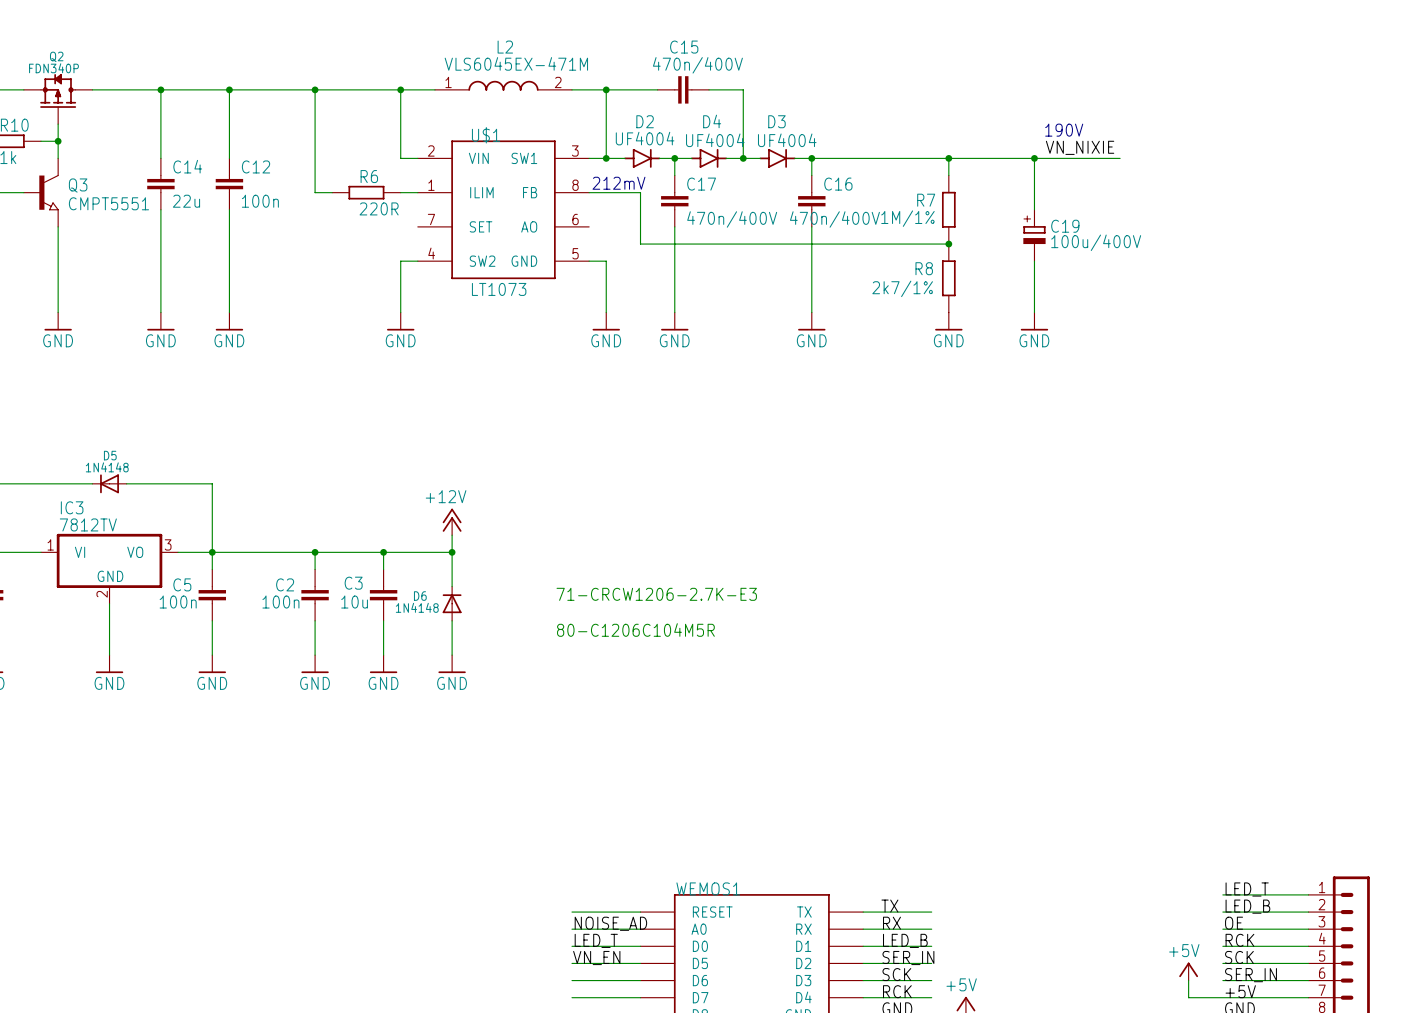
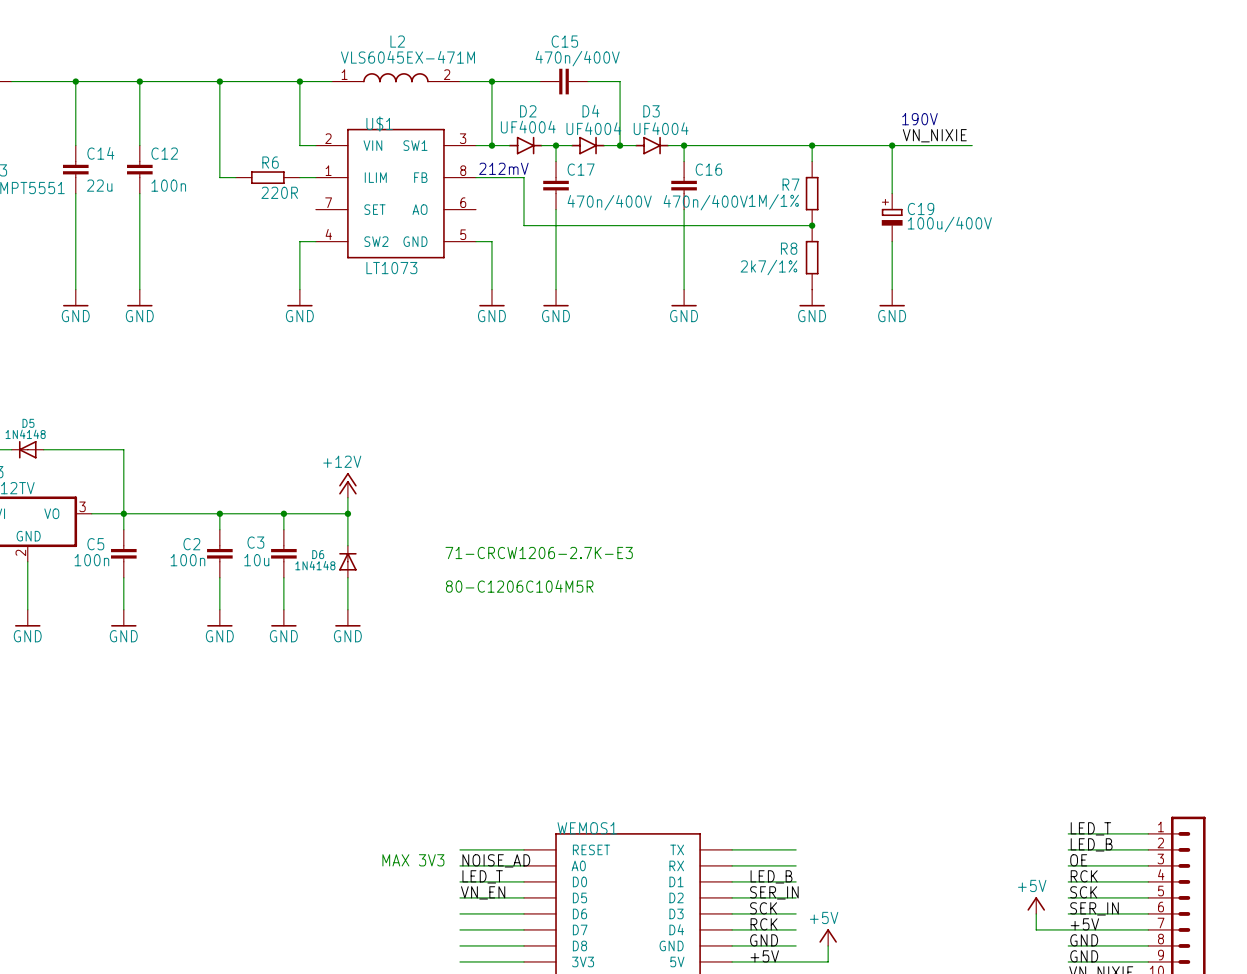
label: TX (889, 906) -> none
text: none -> MAX 3V3 (413, 860)
label: RX (891, 923) -> none

